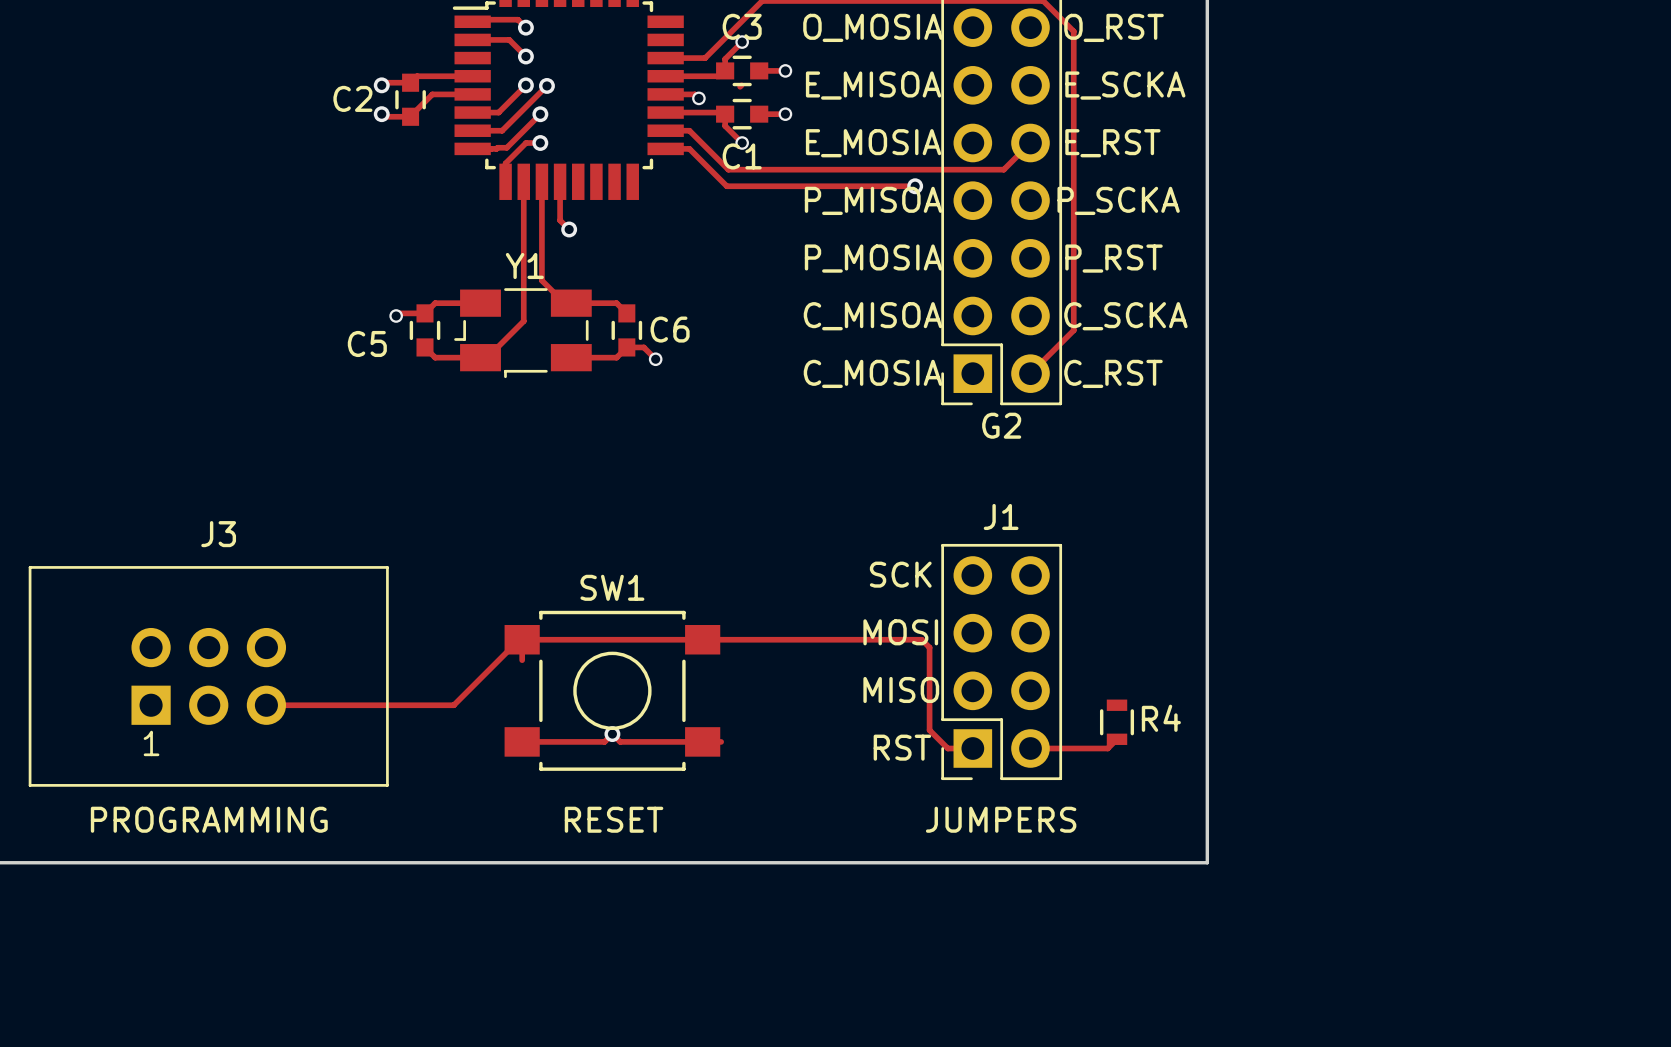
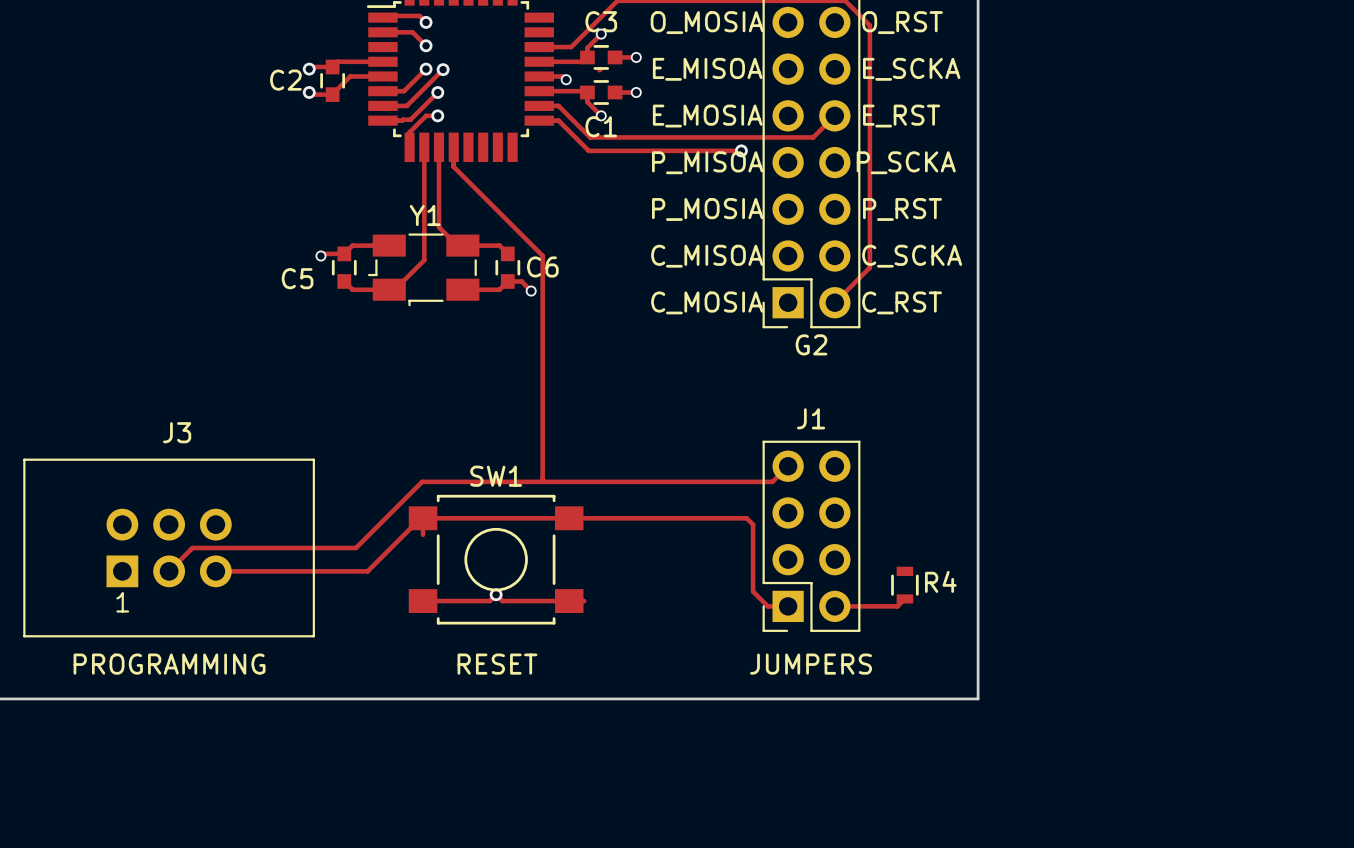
track: (560, 206) (560, 220) (569, 229) -> (453, 166) (542, 255) (542, 477)
via: (569, 229) -> none
text: SCK (900, 574) -> none
track: none -> (788, 466) (772, 481) (422, 481) (355, 547) (192, 547) (169, 571)
text: MOSI (900, 632) -> none
text: MISO (901, 689) -> none
text: RST (902, 747) -> none

